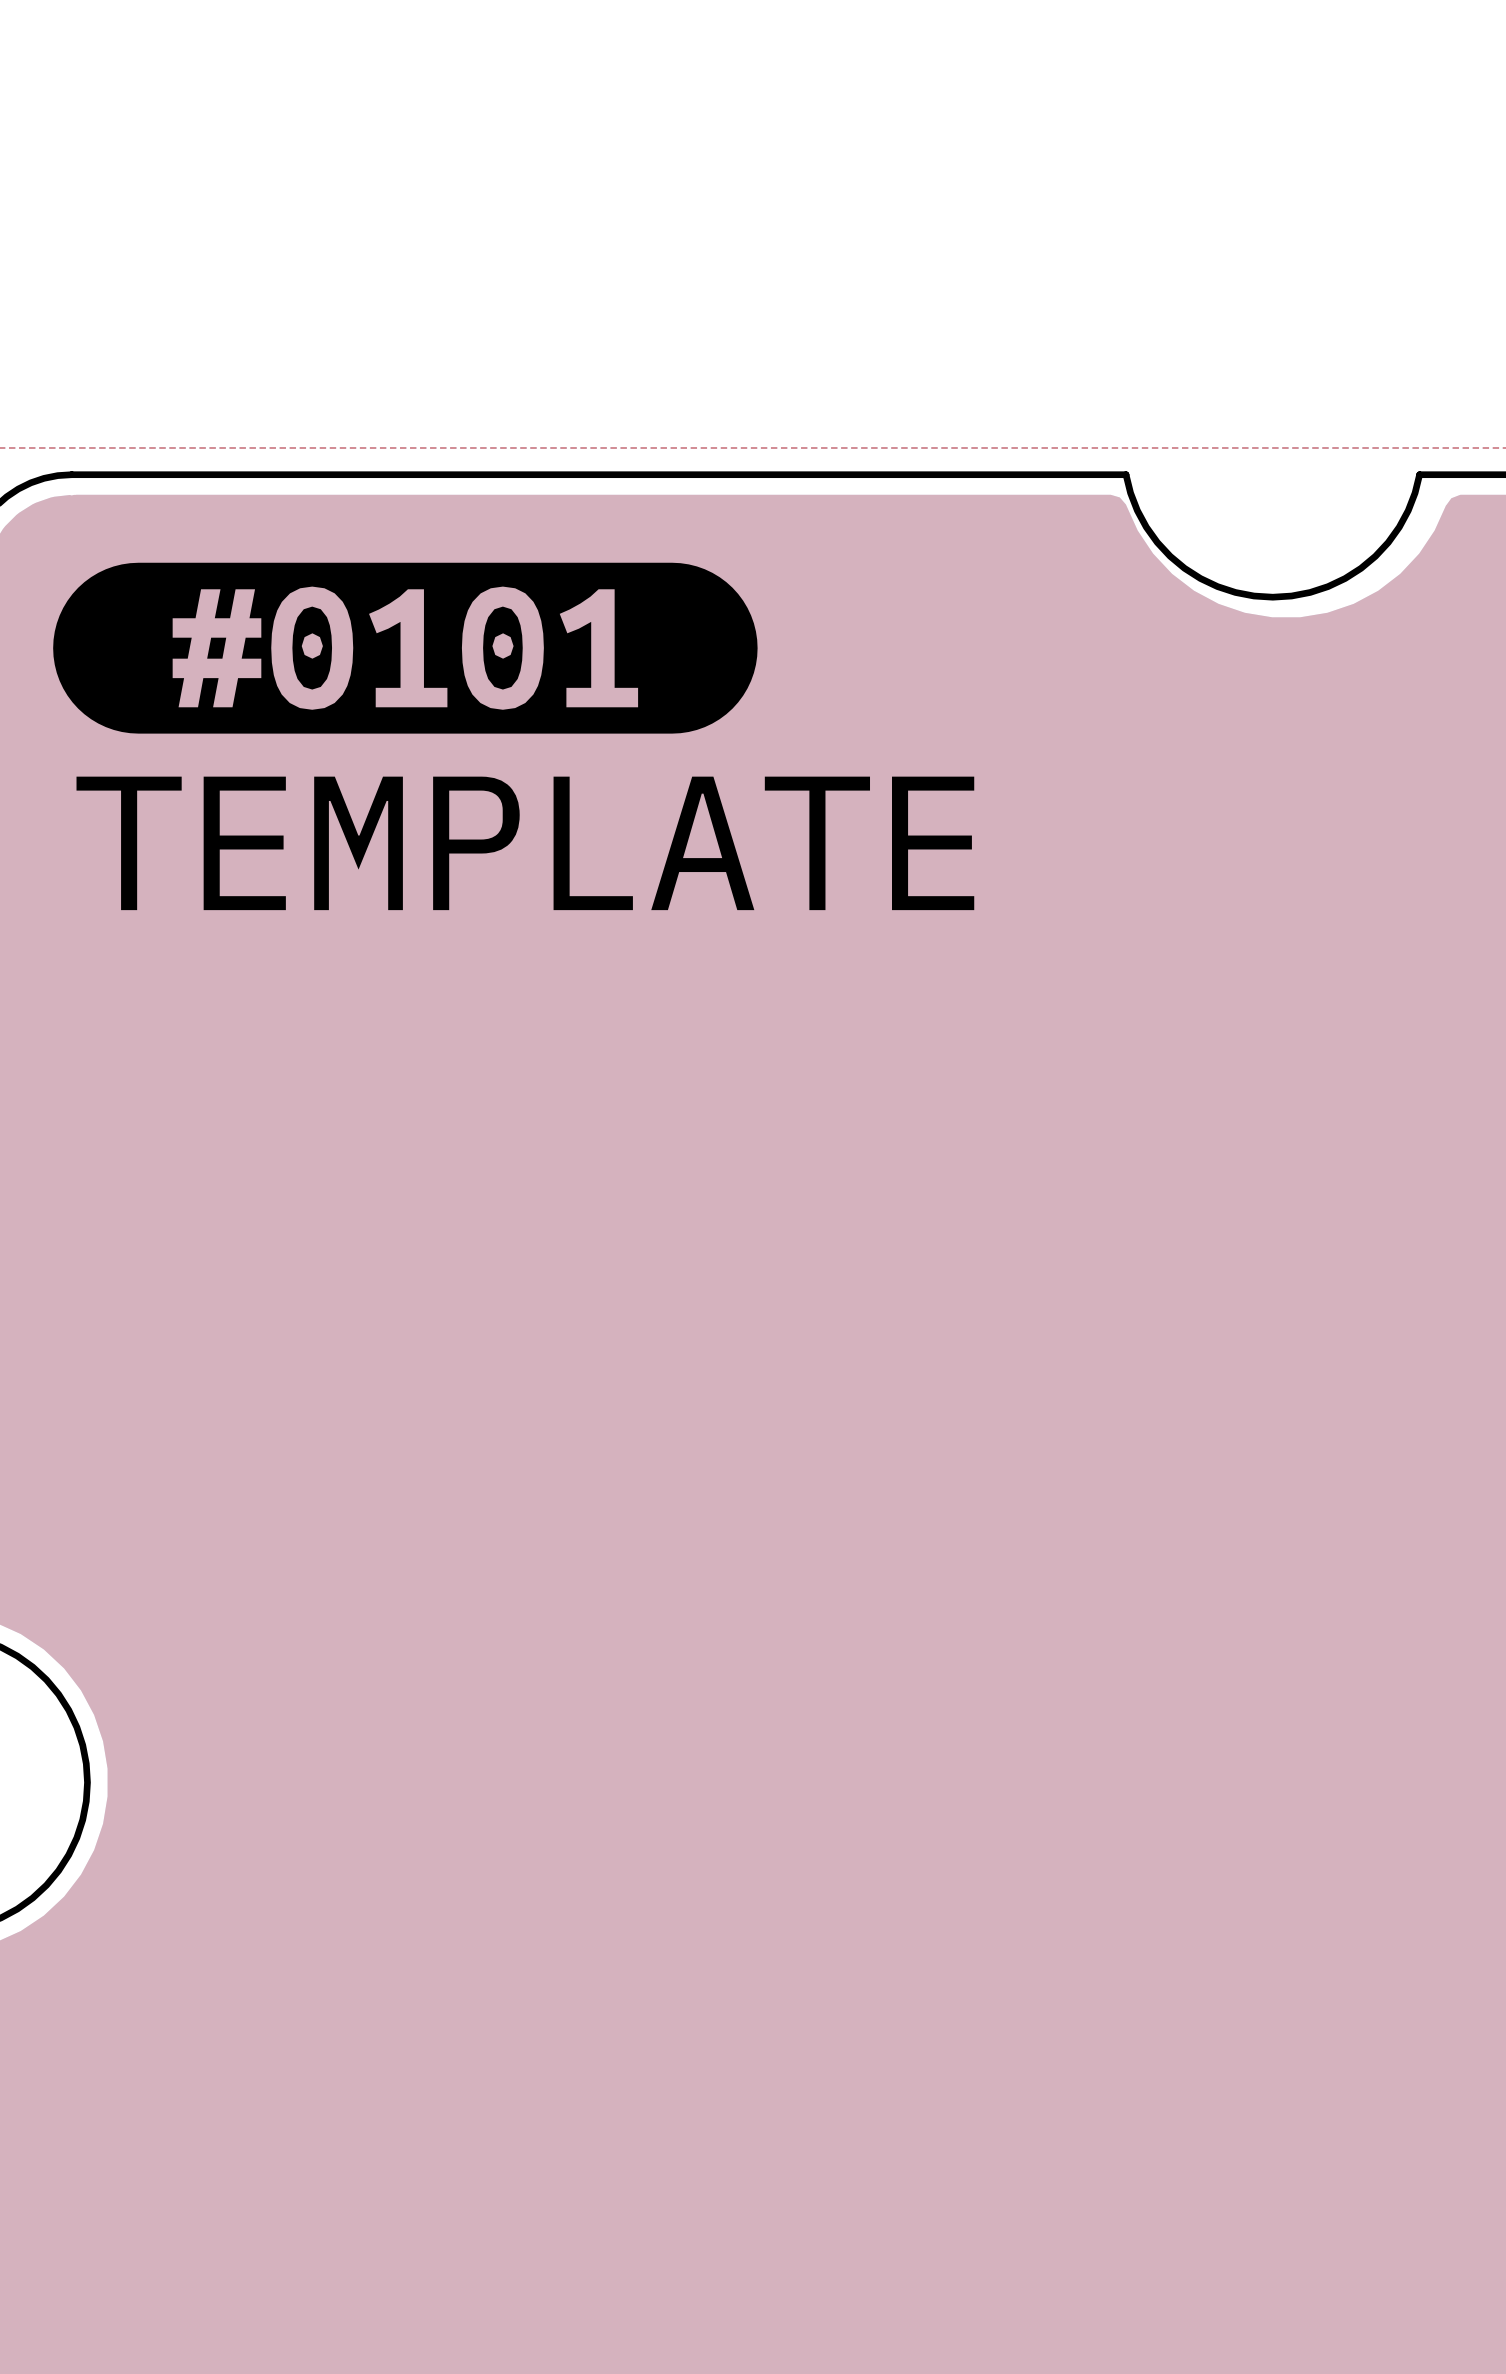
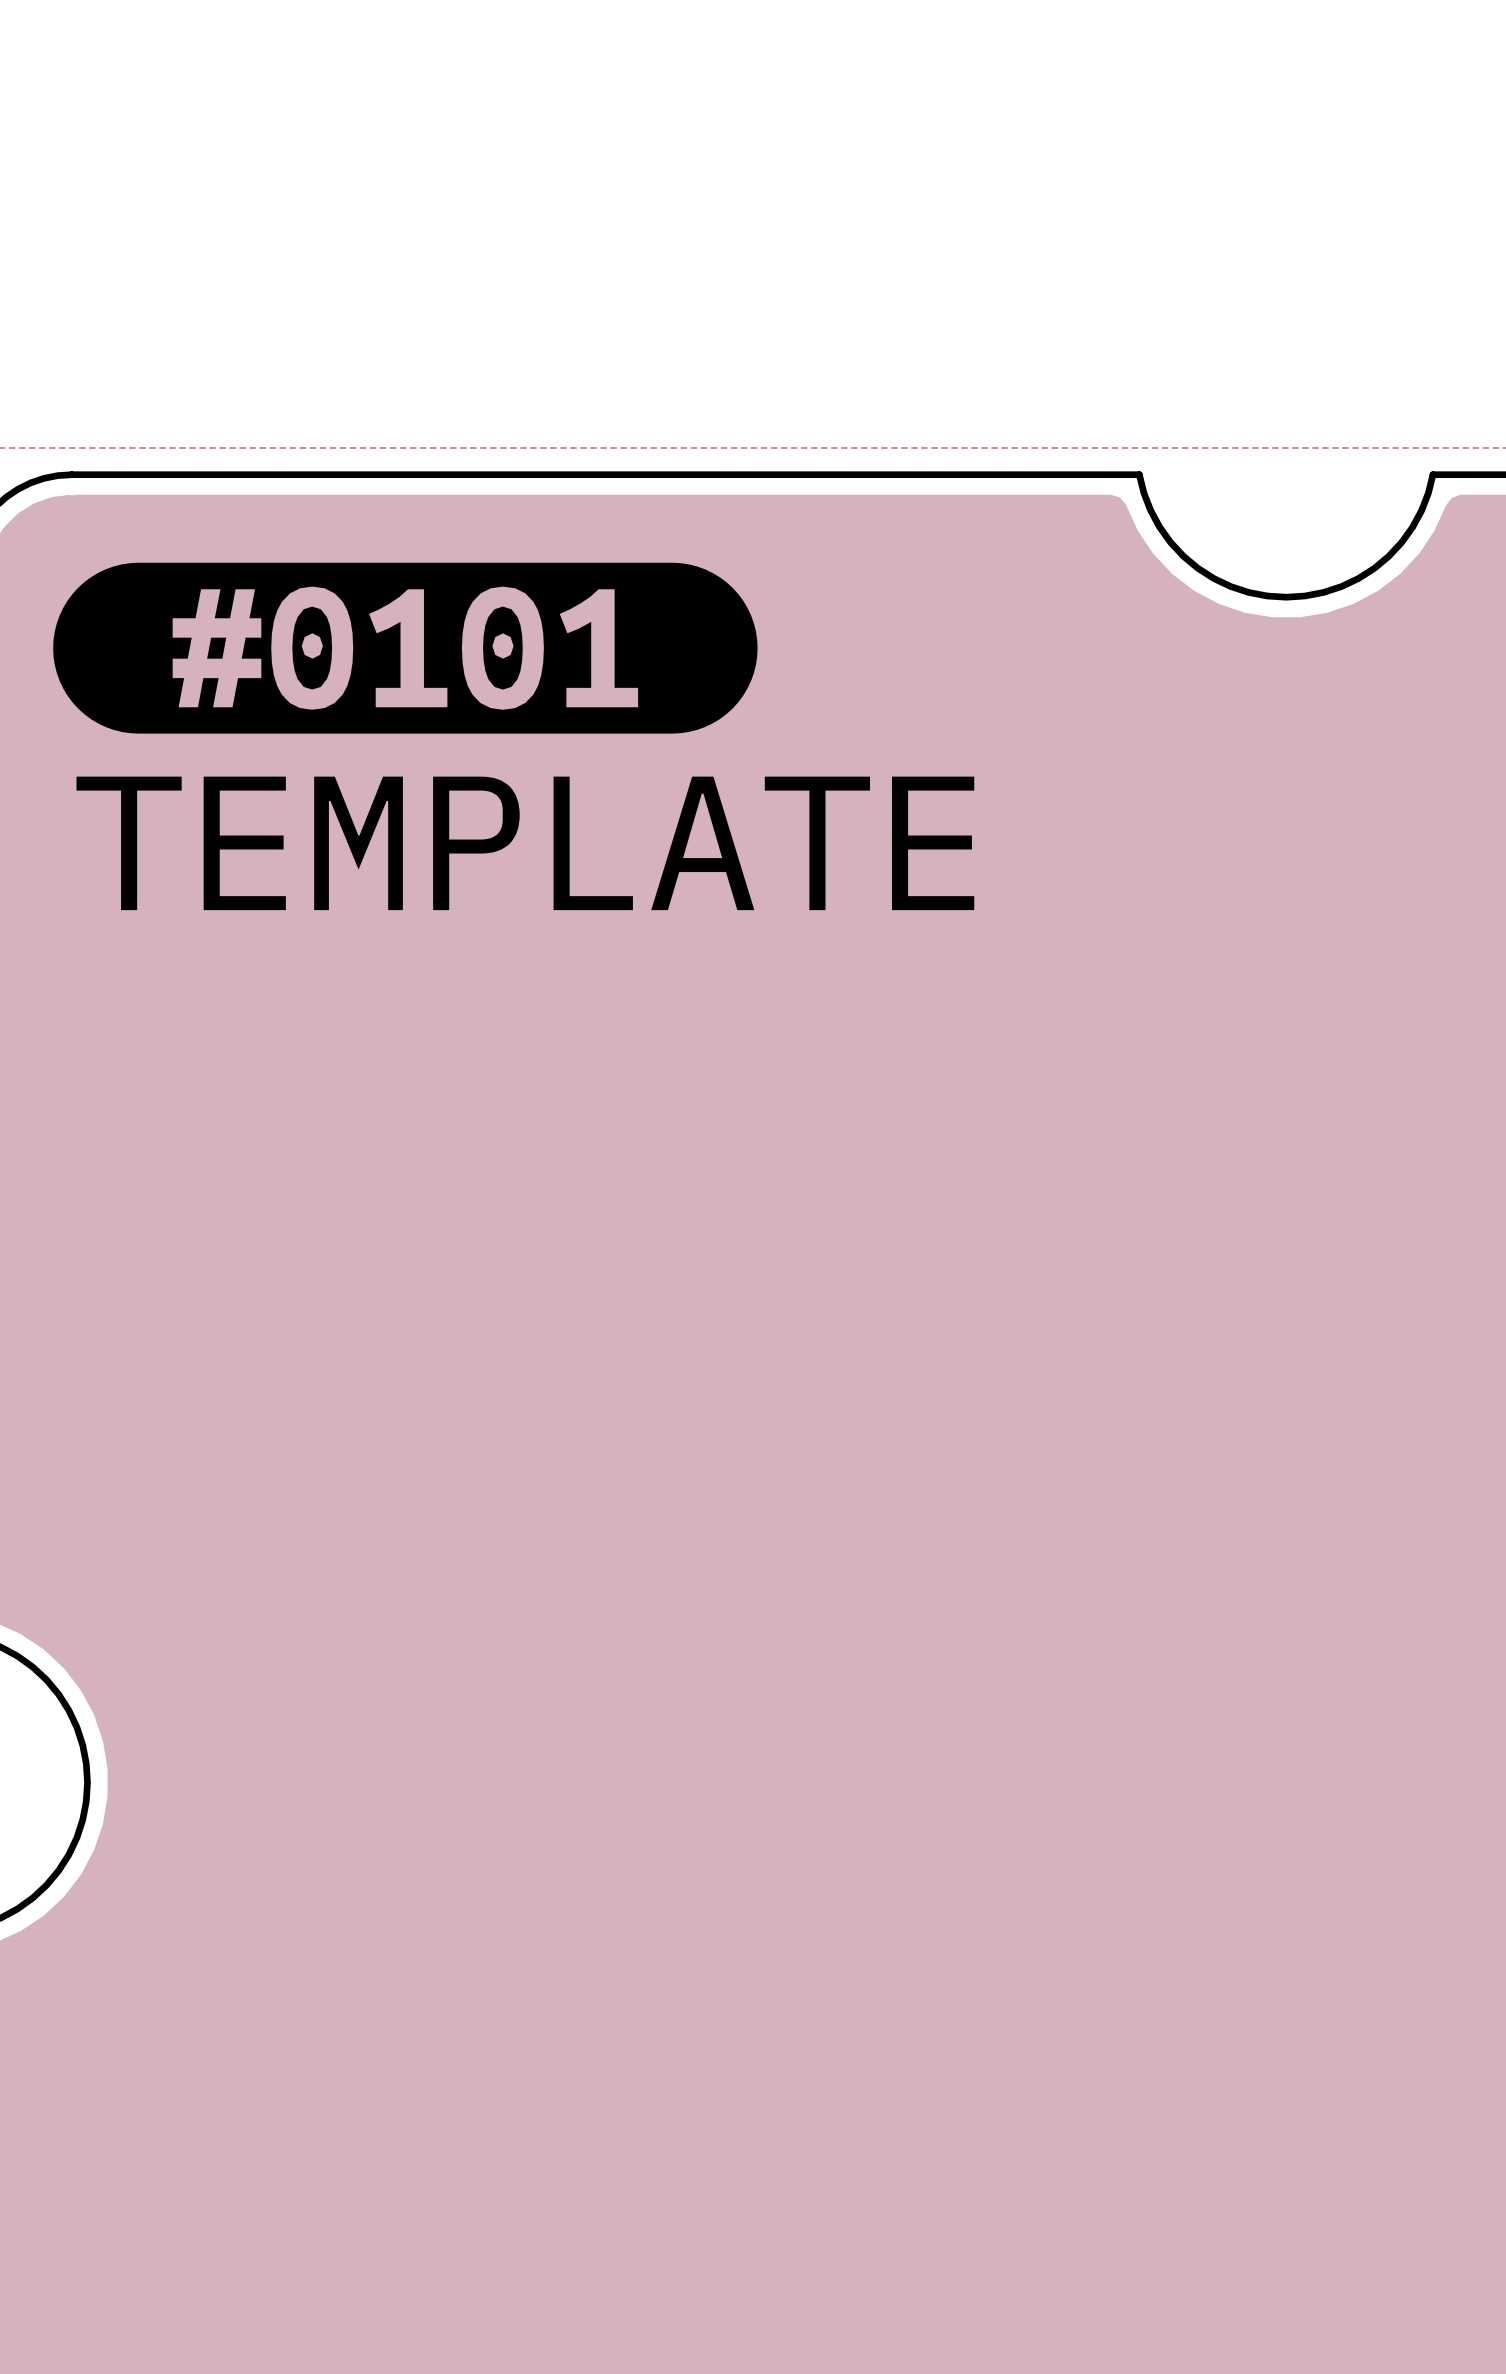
board edge: (1126, 474) (1137, 510) (1157, 542) (1170, 556) (1200, 578) (1217, 586) (1235, 592) (1272, 597) (1310, 592) (1345, 578) (1361, 568) (1375, 556) (1399, 527) (1408, 510) (1419, 474) (1432, 474) -> (1126, 474) (1139, 474) (1150, 510) (1159, 527) (1183, 556) (1197, 568) (1230, 586) (1248, 592) (1286, 597) (1323, 592) (1341, 586) (1358, 578) (1388, 556) (1412, 527) (1421, 510) (1432, 474)

